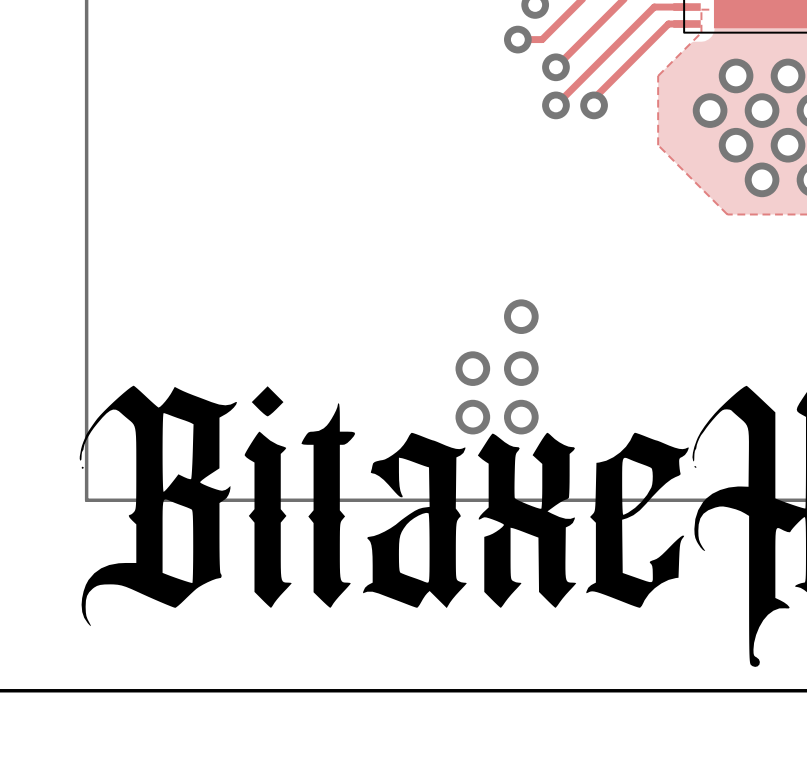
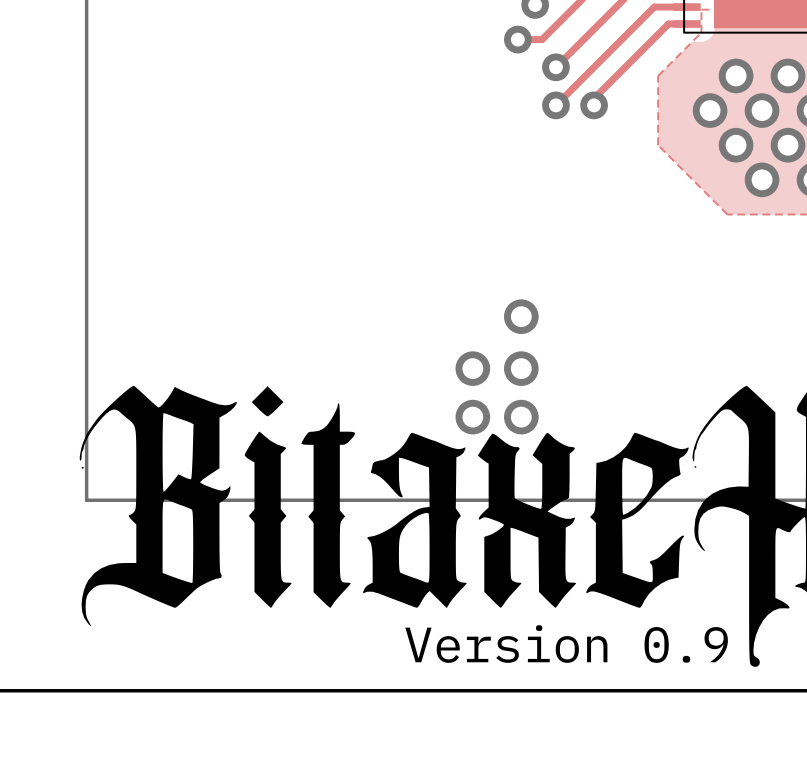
text: none -> Version 0.9 (566, 644)

